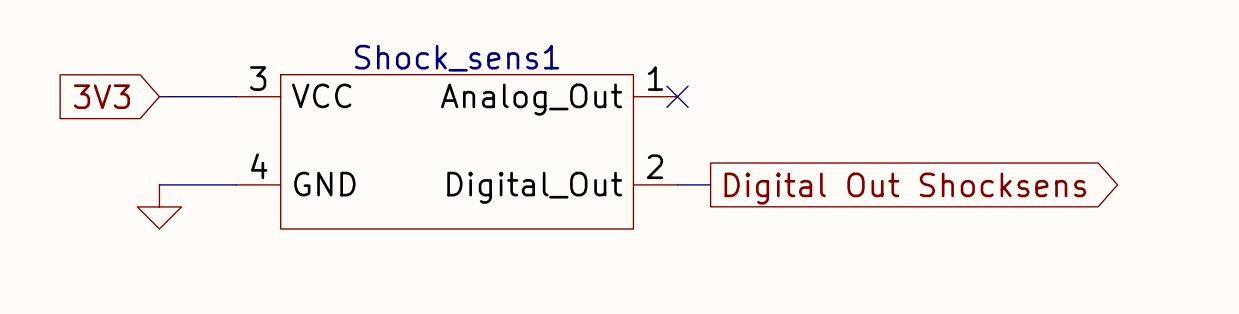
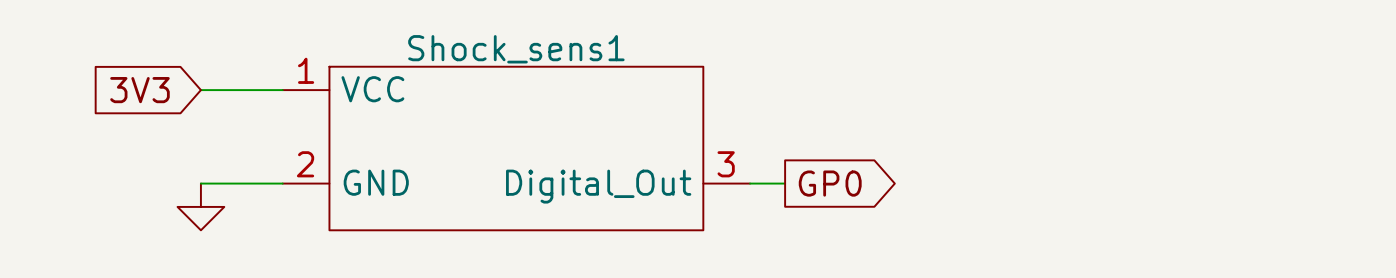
Shock_sens1 symbol: [236, 74, 678, 230] -> [282, 66, 751, 231]
no-connect mark: (677, 96) -> none
global label: Digital Out Shocksens (905, 188) -> GP0 (830, 183)

